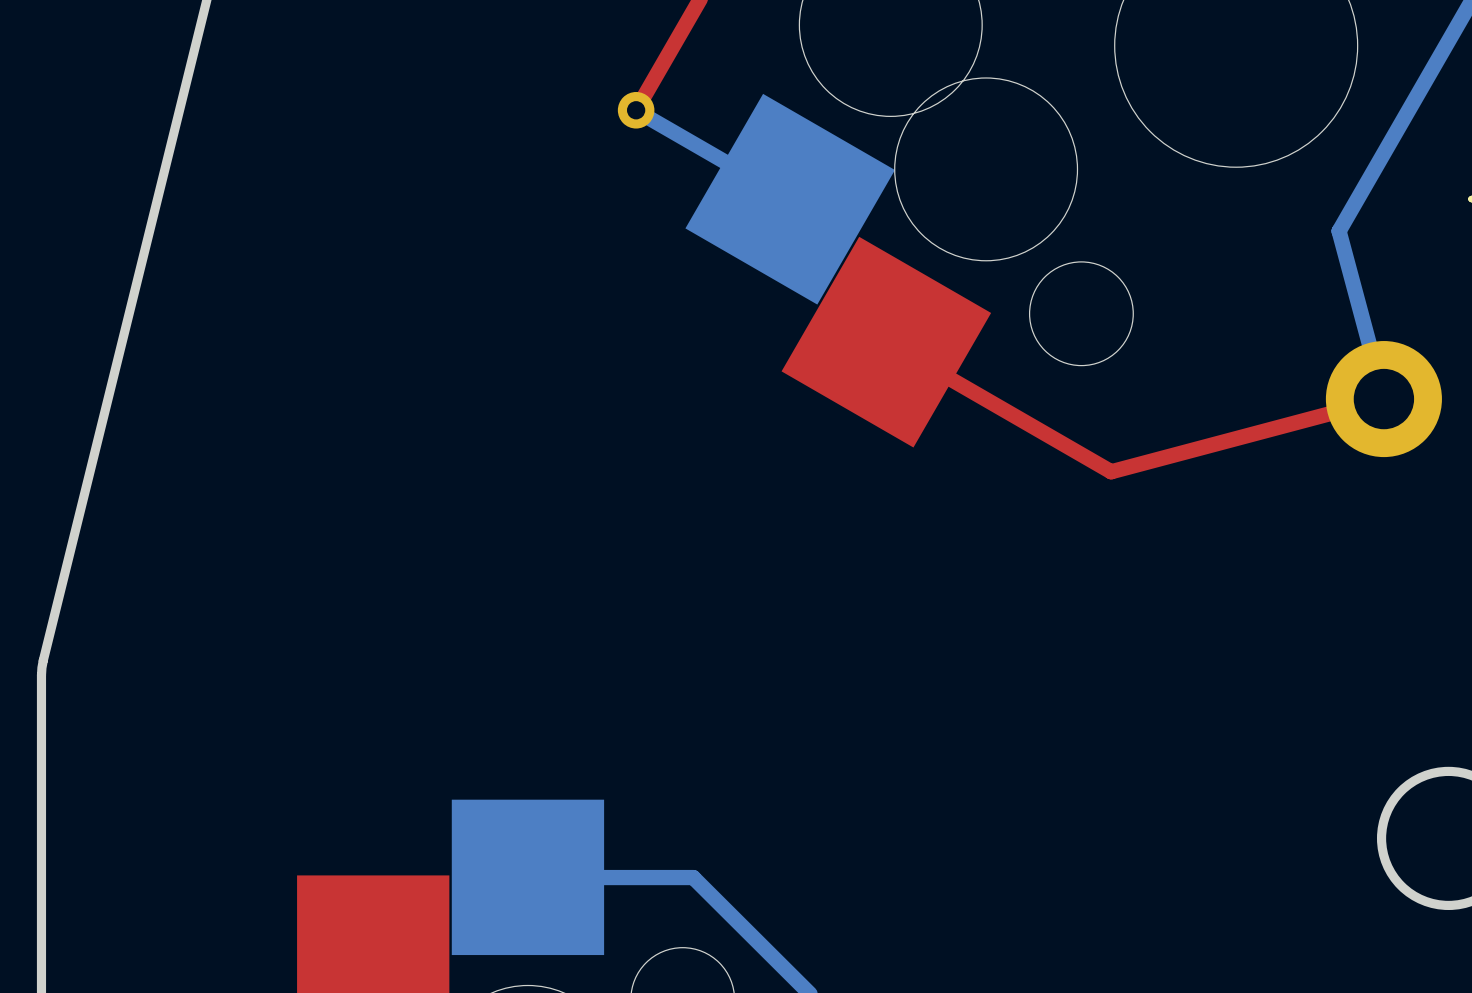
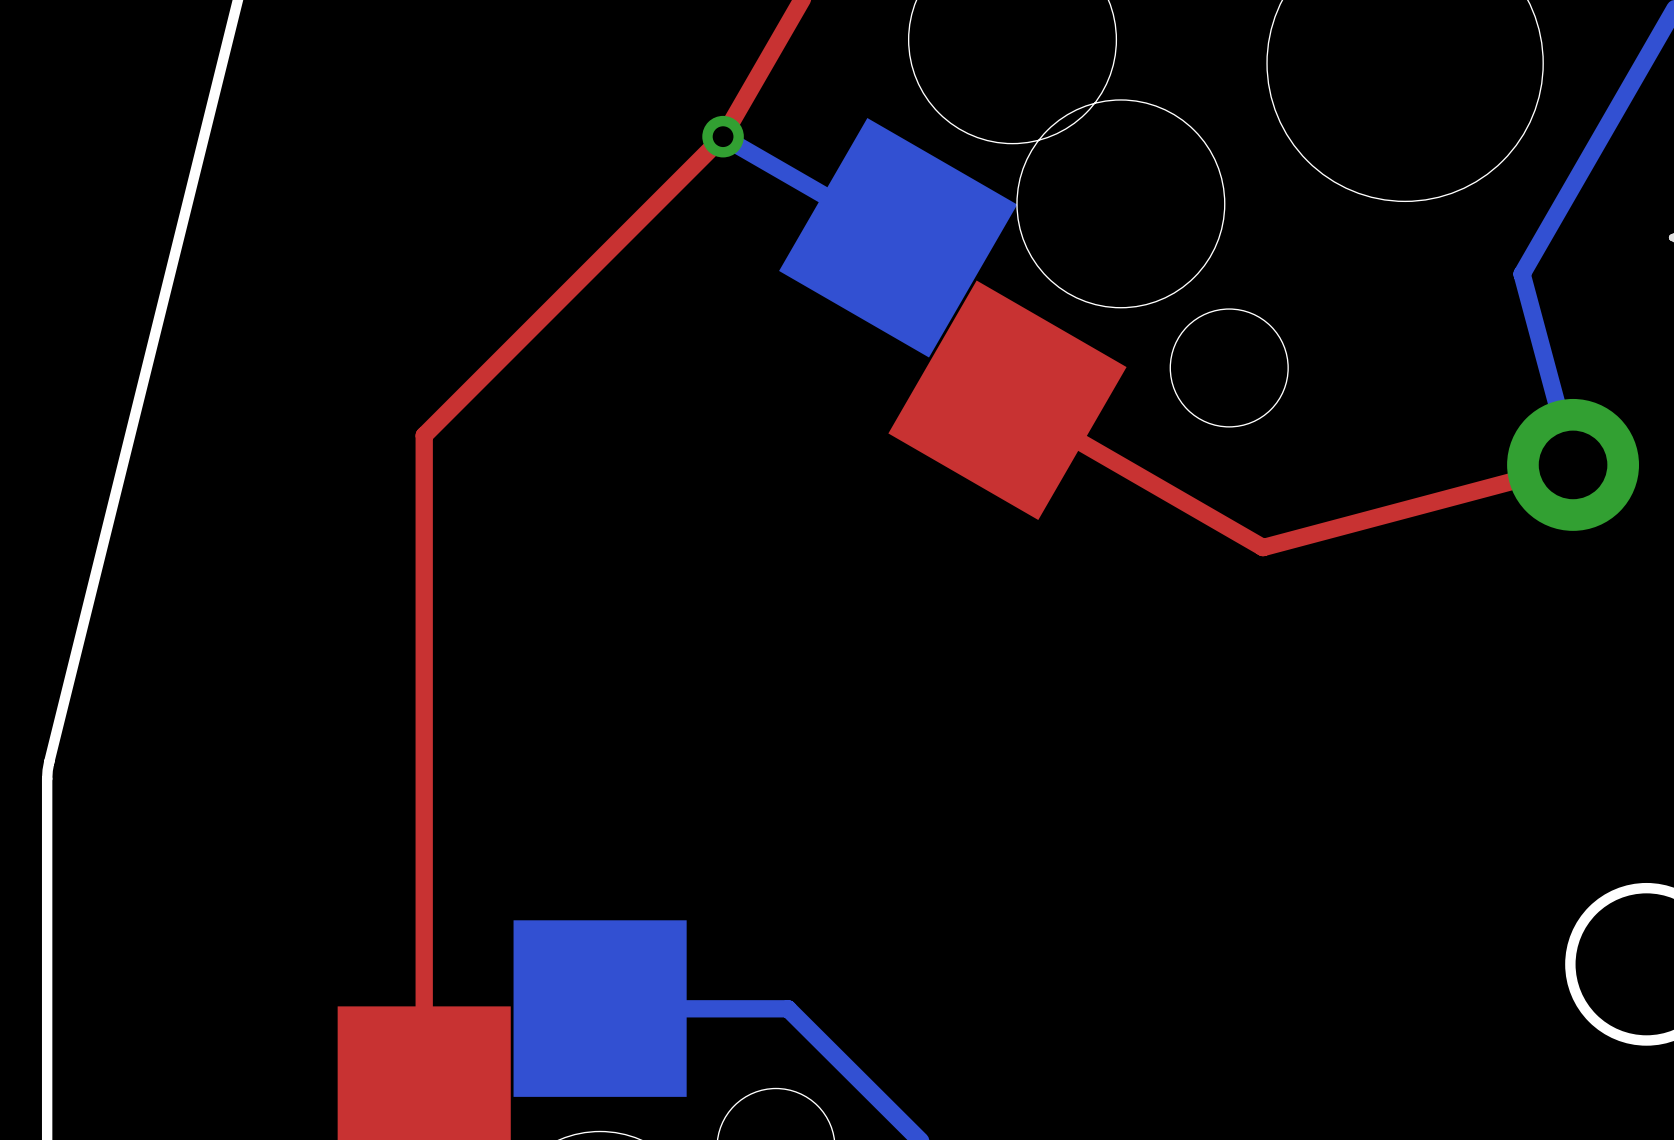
top track: none -> (723, 136) (424, 435) (424, 1094)

